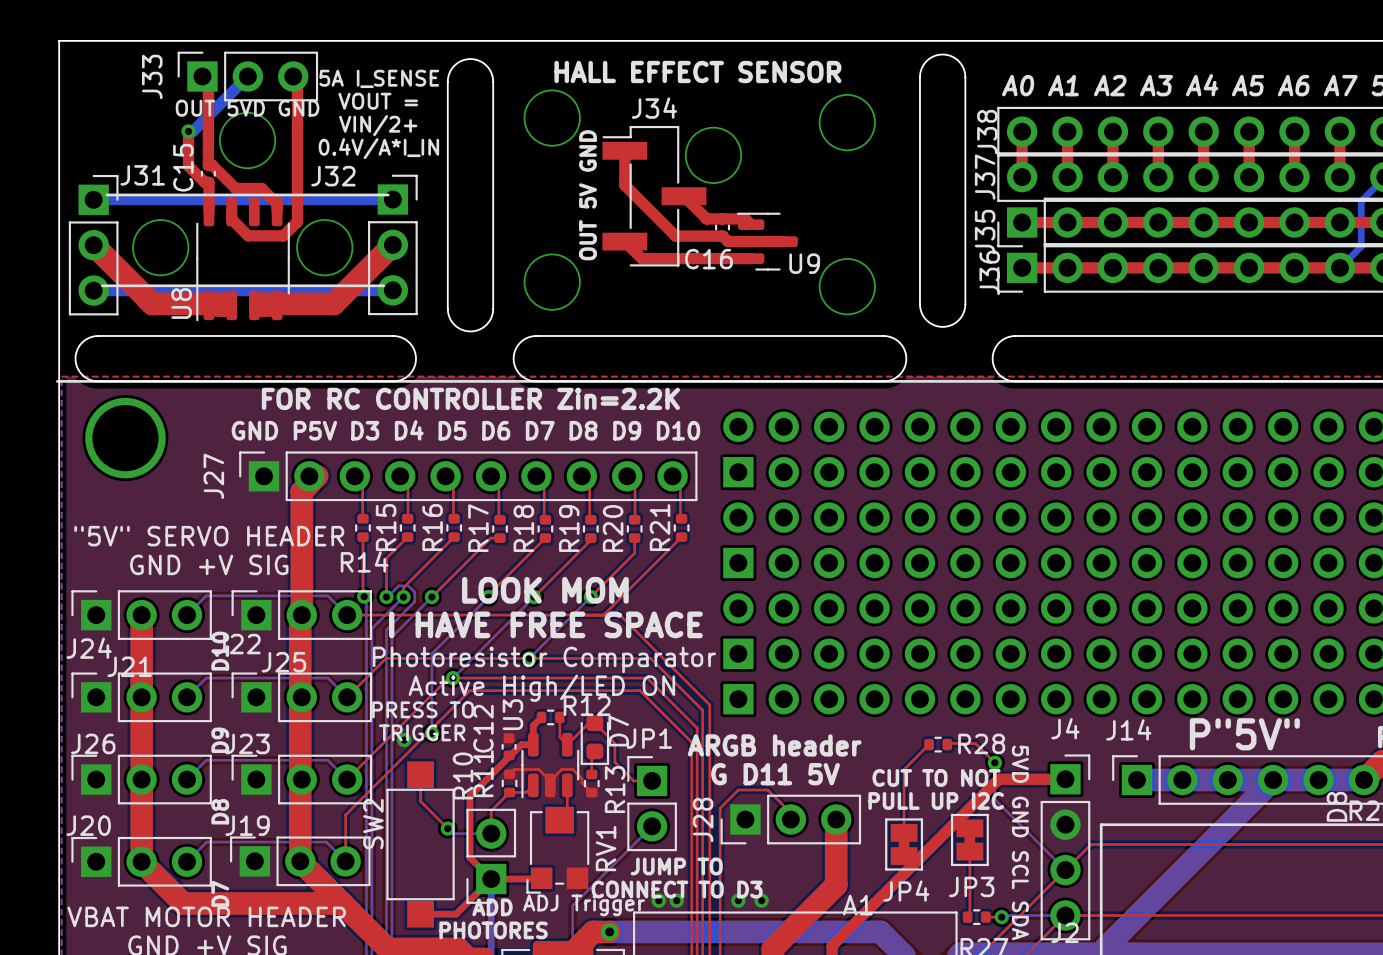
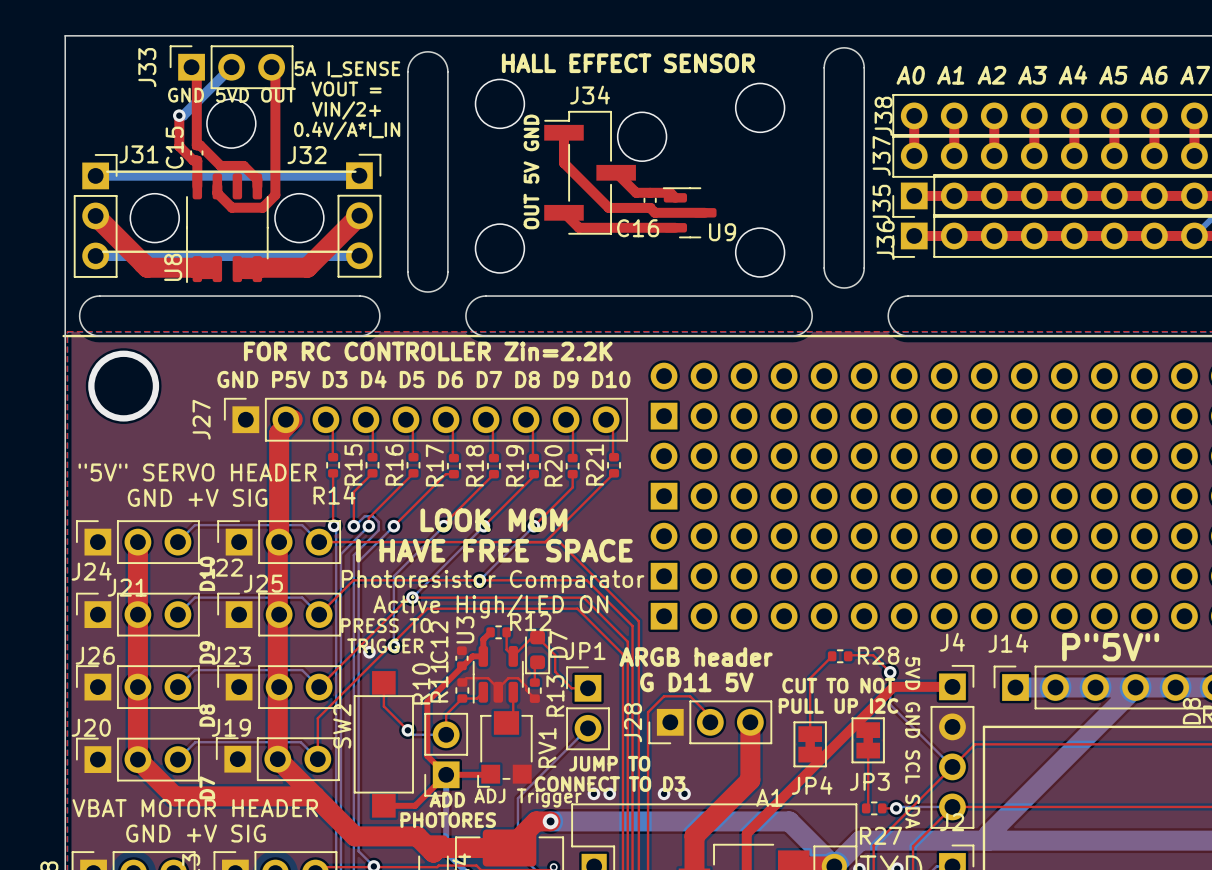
text: OUT 5VD GND (247, 108) -> GND 5VD OUT (231, 95)

